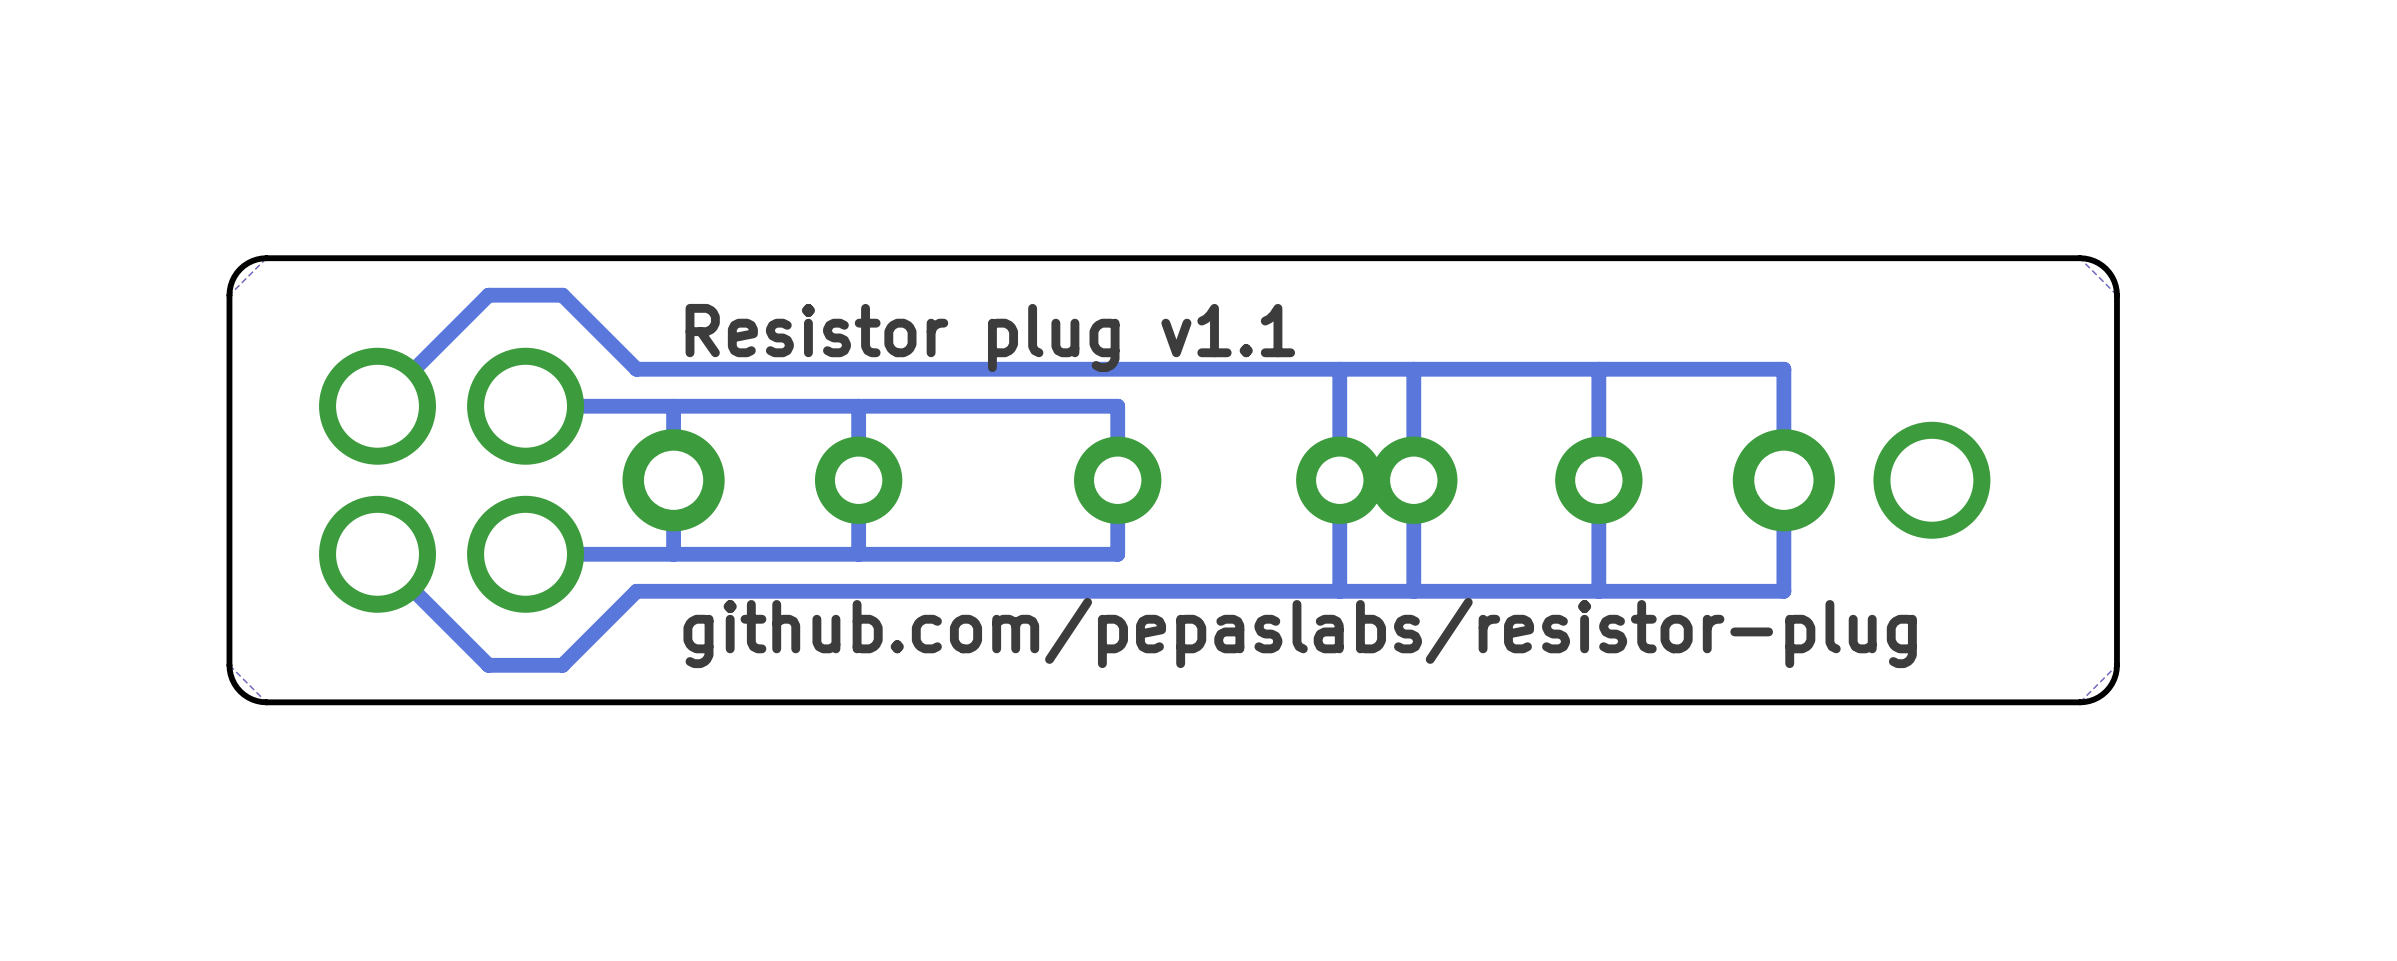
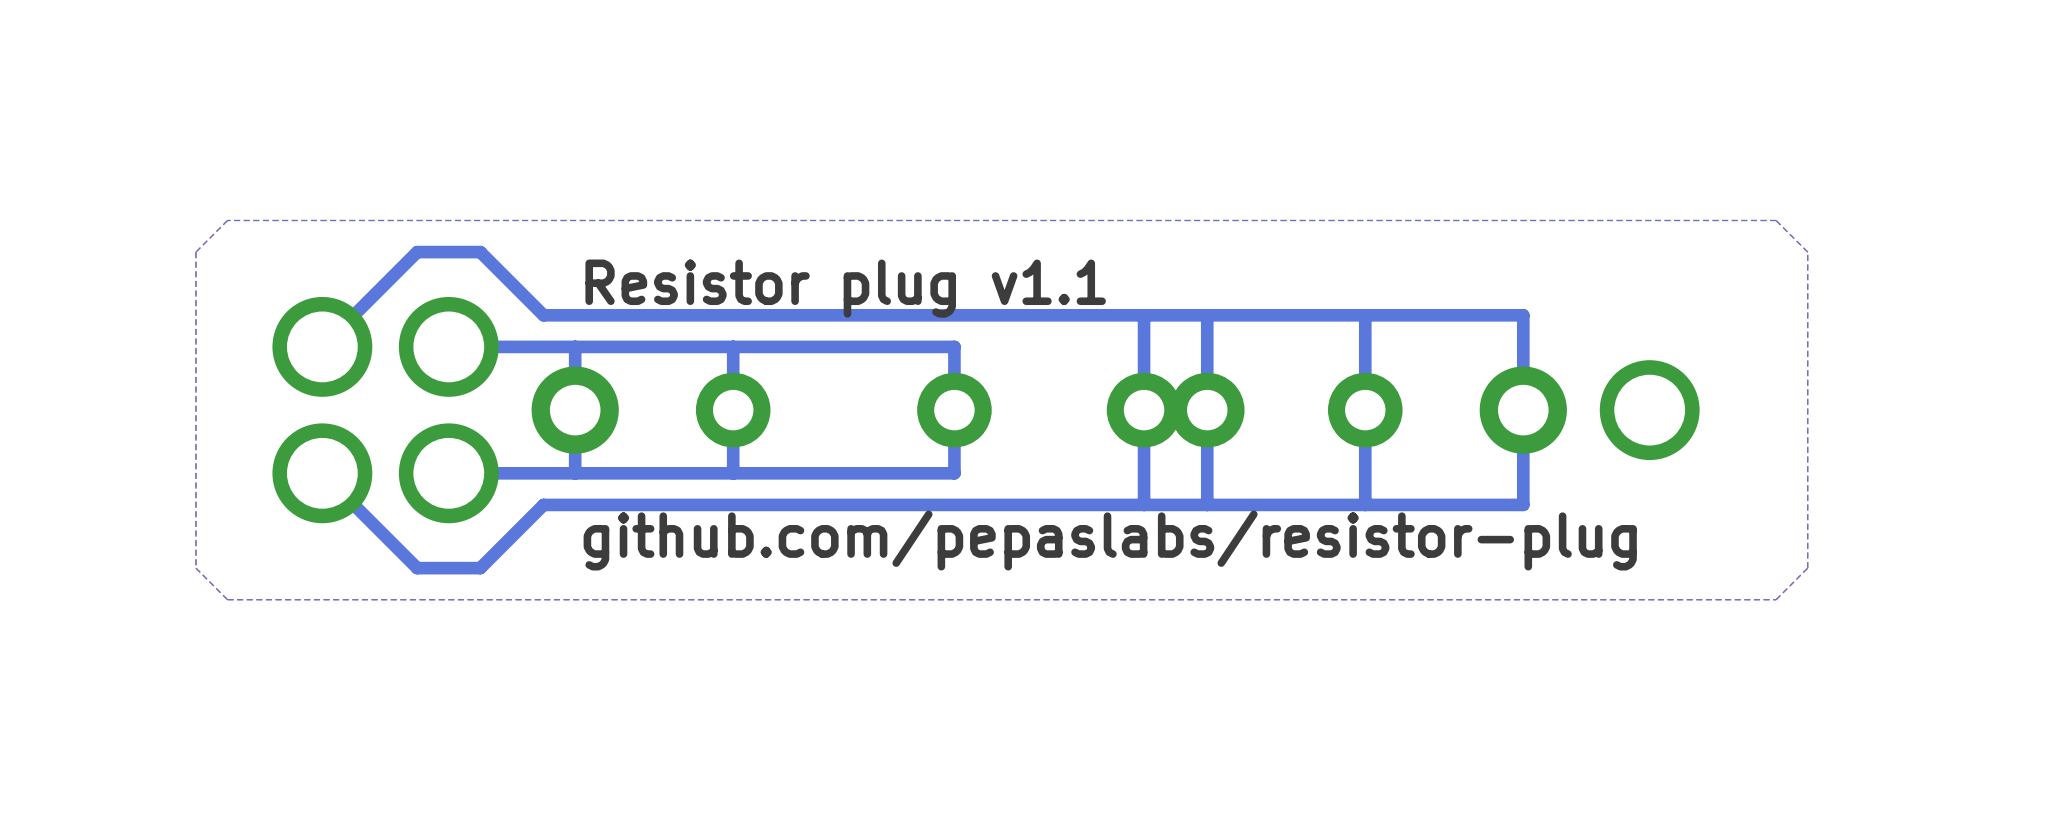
board edge: (2079, 258) (256, 259) (247, 263) (237, 272) (232, 281) (229, 295) (230, 674) (237, 687) (243, 694) (252, 699) (266, 702) (2089, 701) (2106, 691) (2114, 679) (2116, 670) (2116, 295) (2114, 281) (2106, 269) (2094, 261) (2079, 258) -> none

